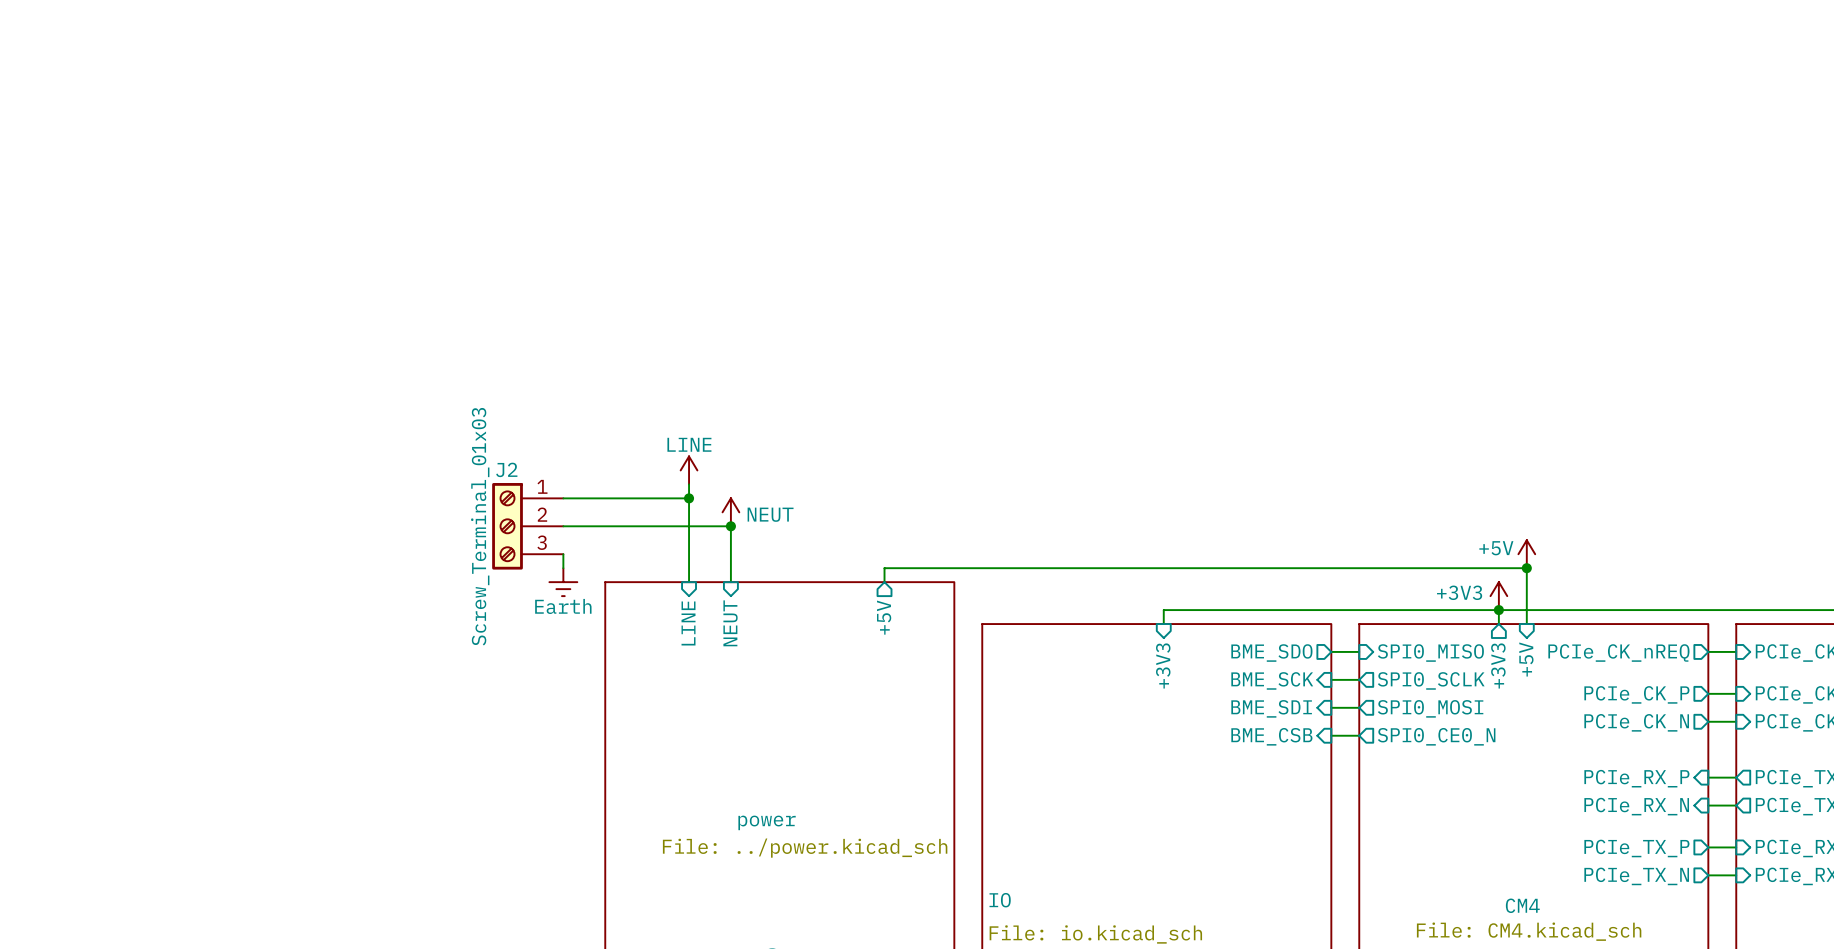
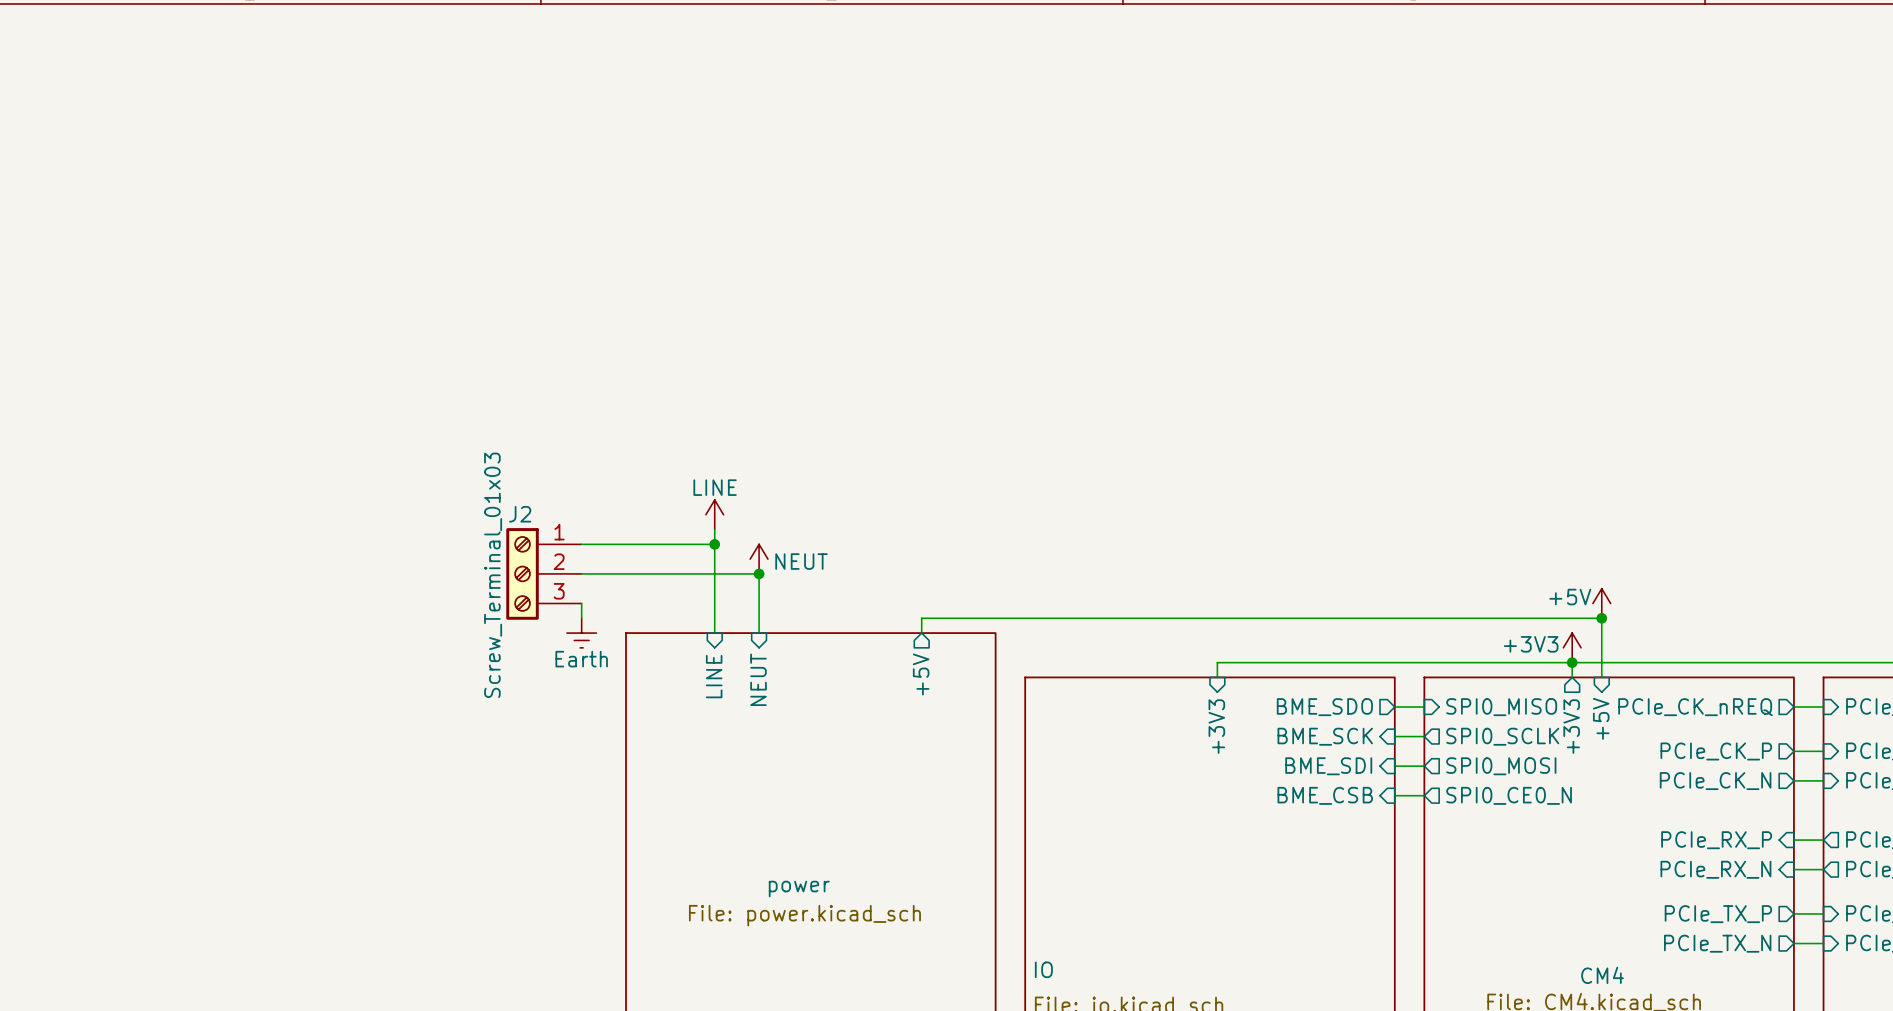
sheet power value: File: ../power.kicad_sch (805, 848) -> File: power.kicad_sch (804, 915)

